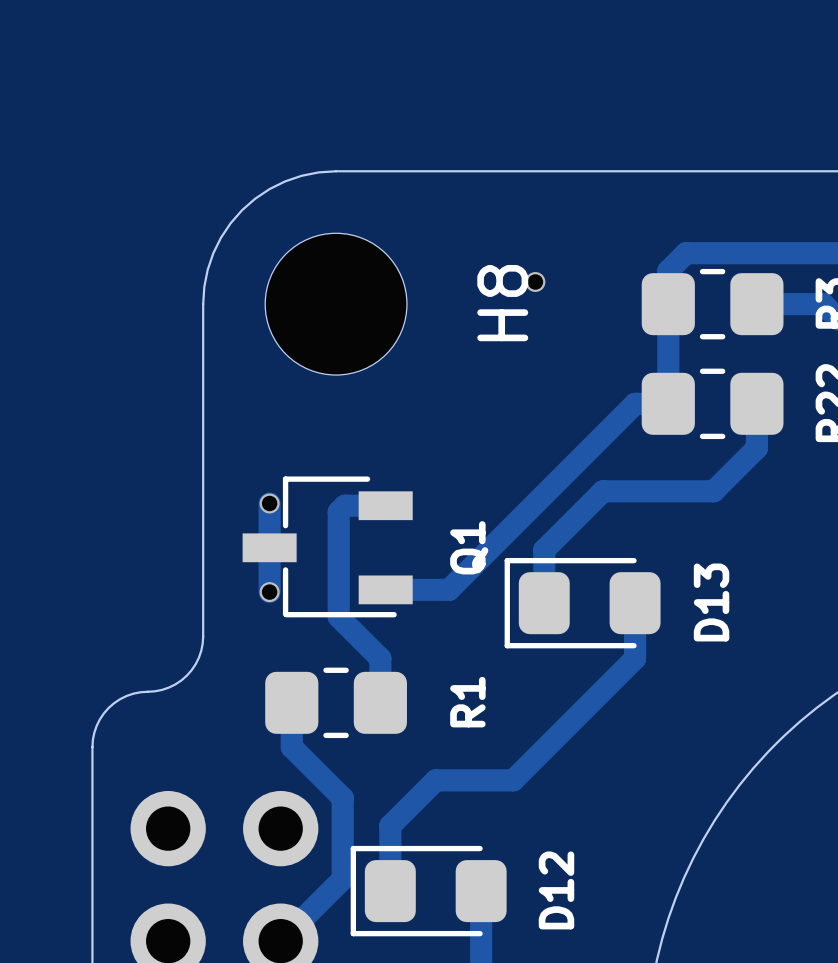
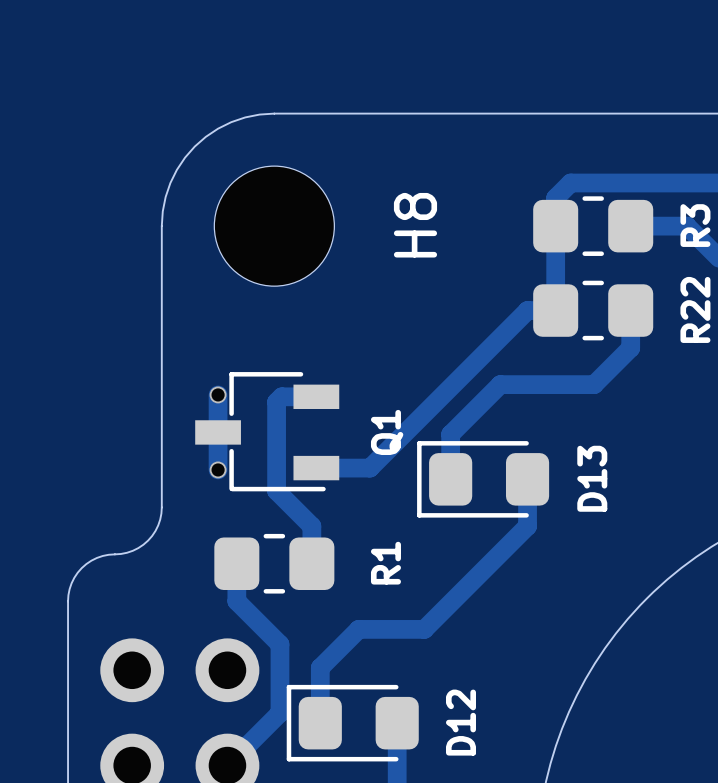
via: (535, 282) -> none

